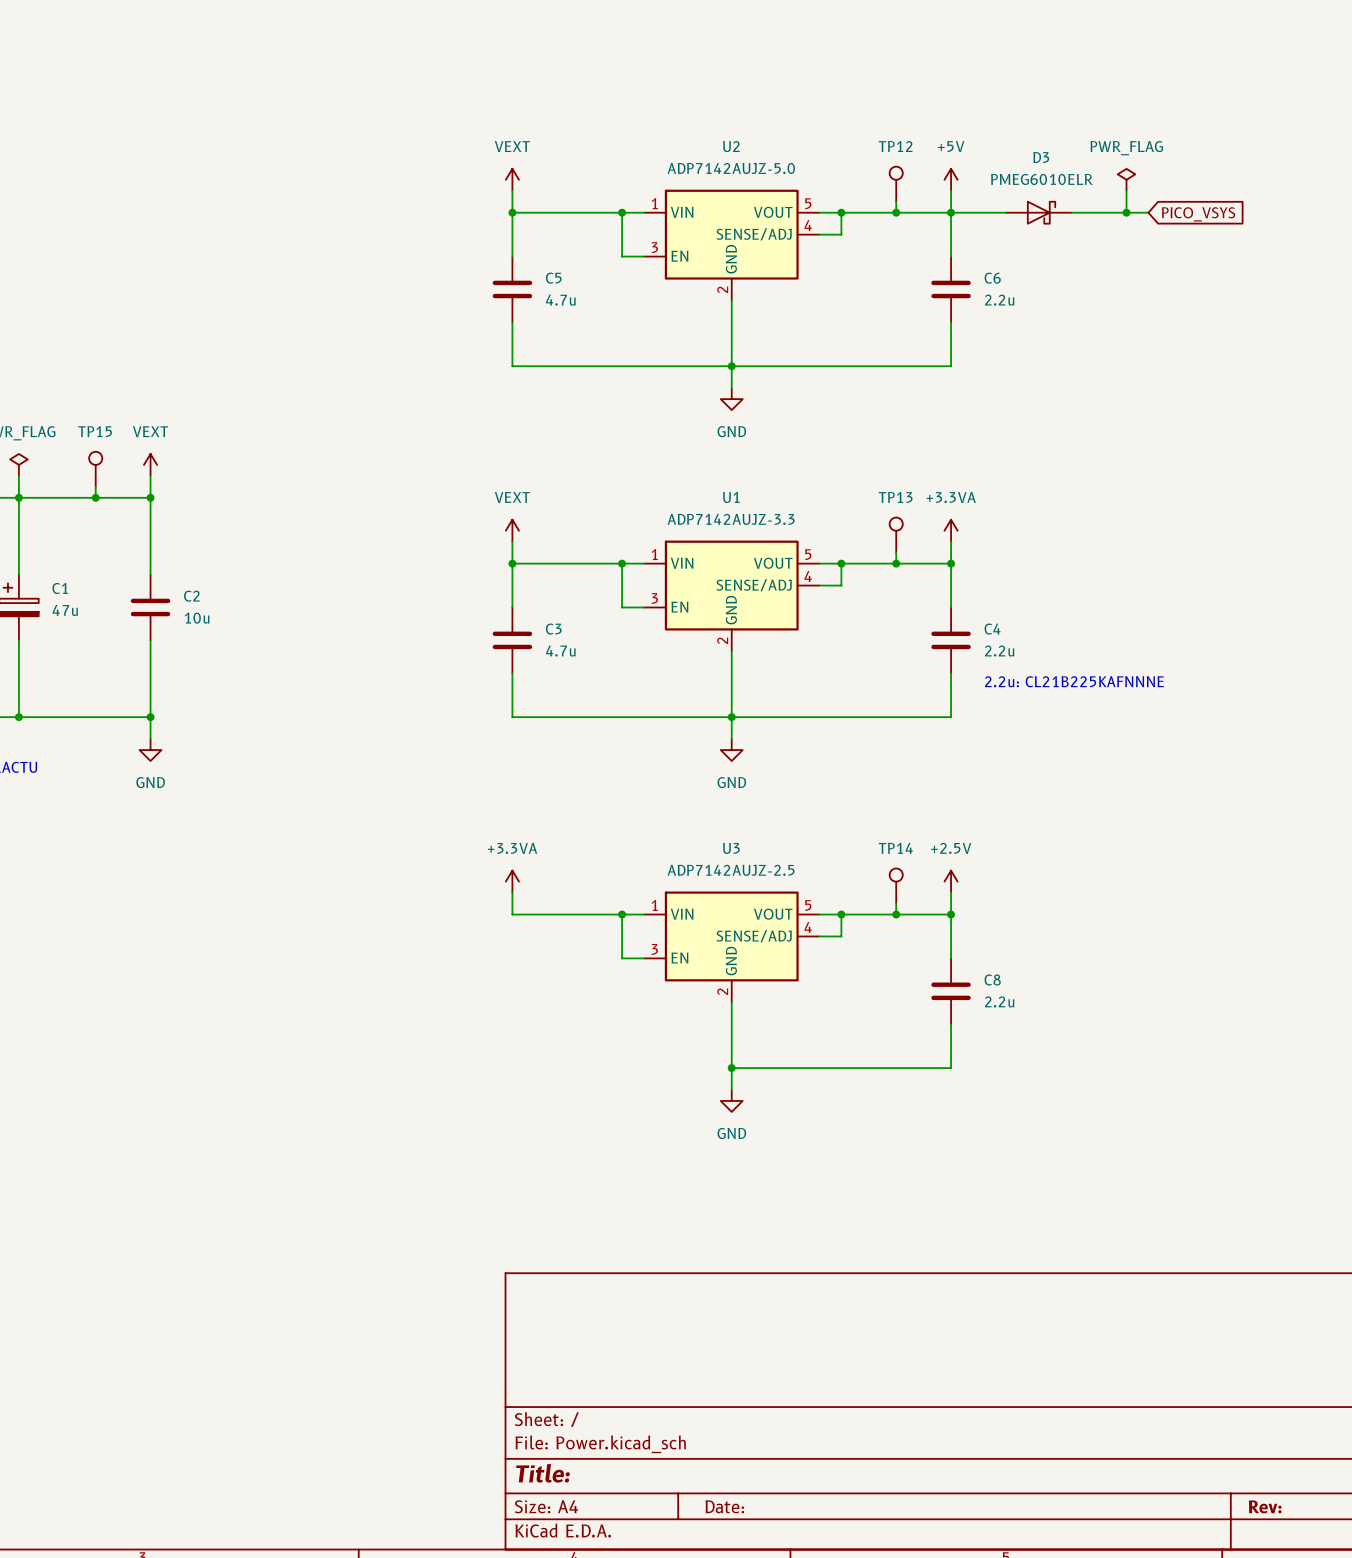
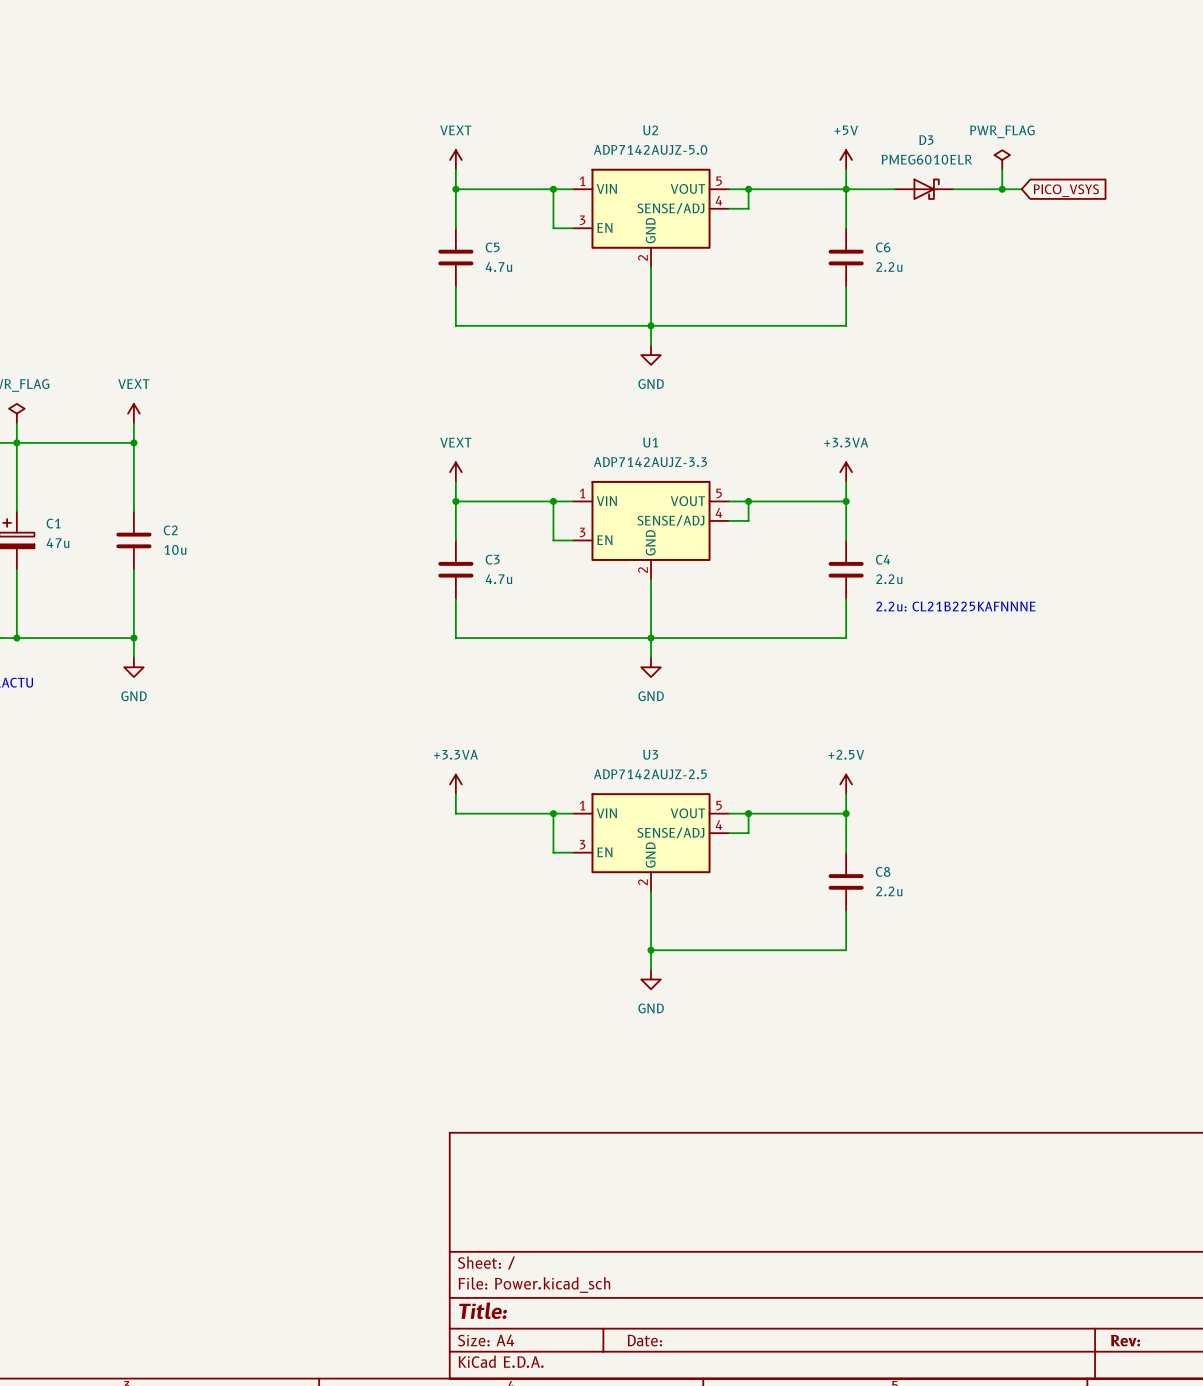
TP12: (896, 184) -> none
wire: (896, 201) (896, 212) -> none
junction: (896, 212) -> none
TP15: (95, 469) -> none
wire: (95, 486) (95, 497) -> none
junction: (95, 497) -> none
TP13: (896, 535) -> none
wire: (896, 552) (896, 563) -> none
junction: (896, 563) -> none
TP14: (896, 886) -> none
wire: (896, 903) (896, 914) -> none
junction: (896, 914) -> none

